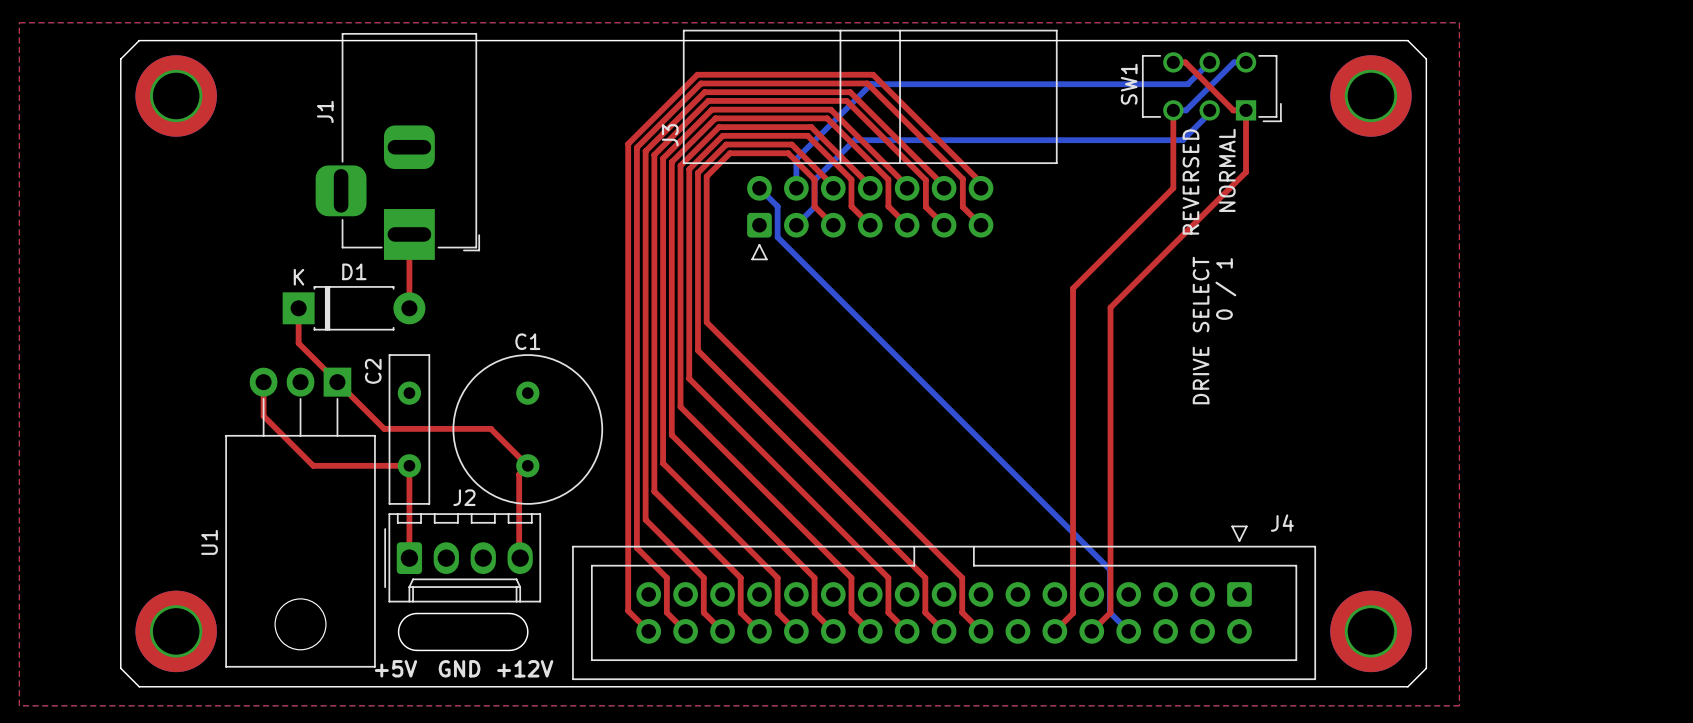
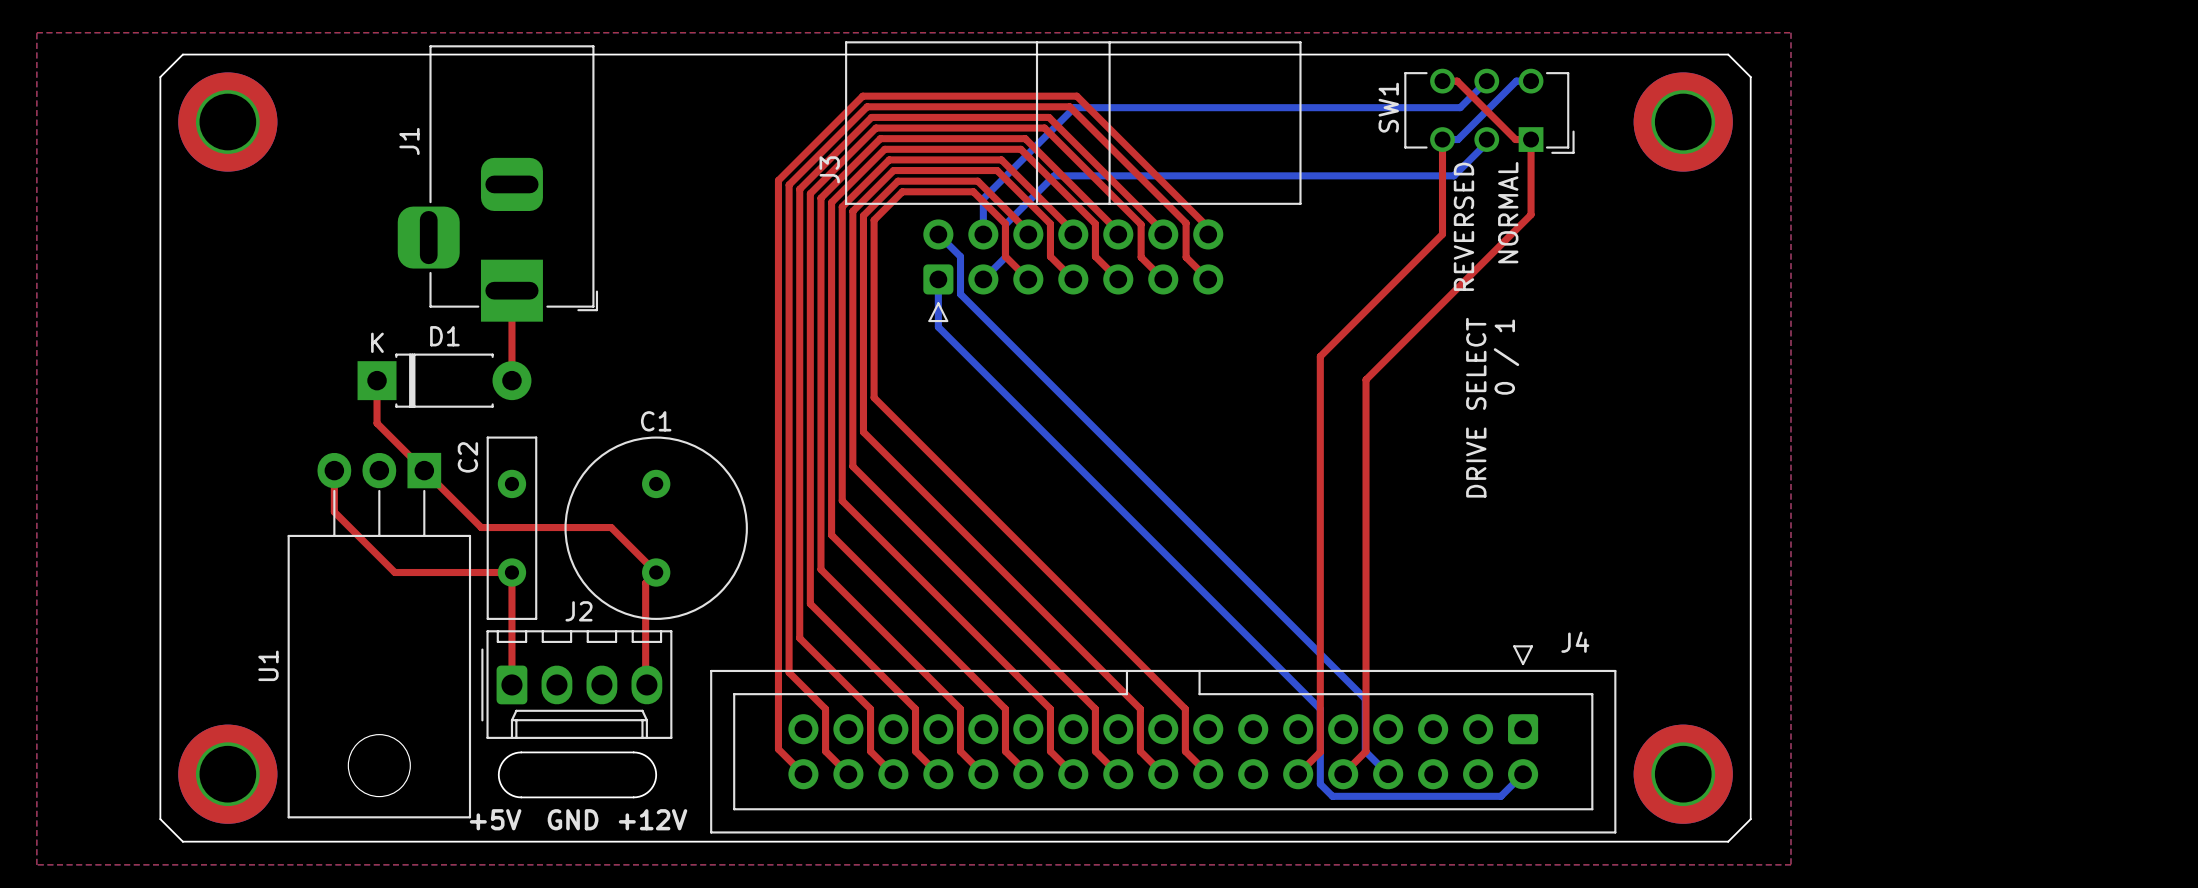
bottom track: none -> (938, 279) (938, 327) (1320, 709) (1320, 784) (1332, 796) (1500, 796) (1523, 774)

